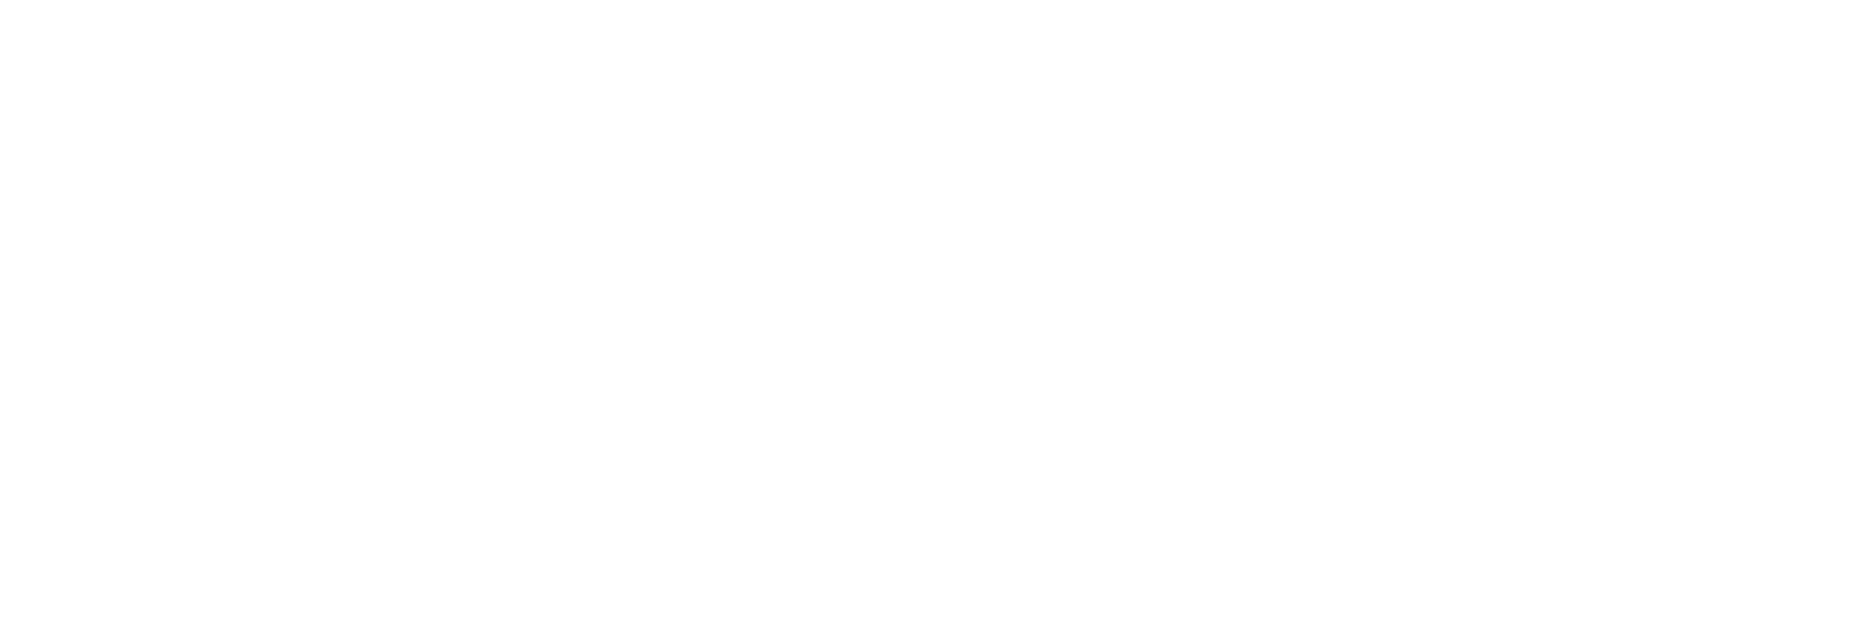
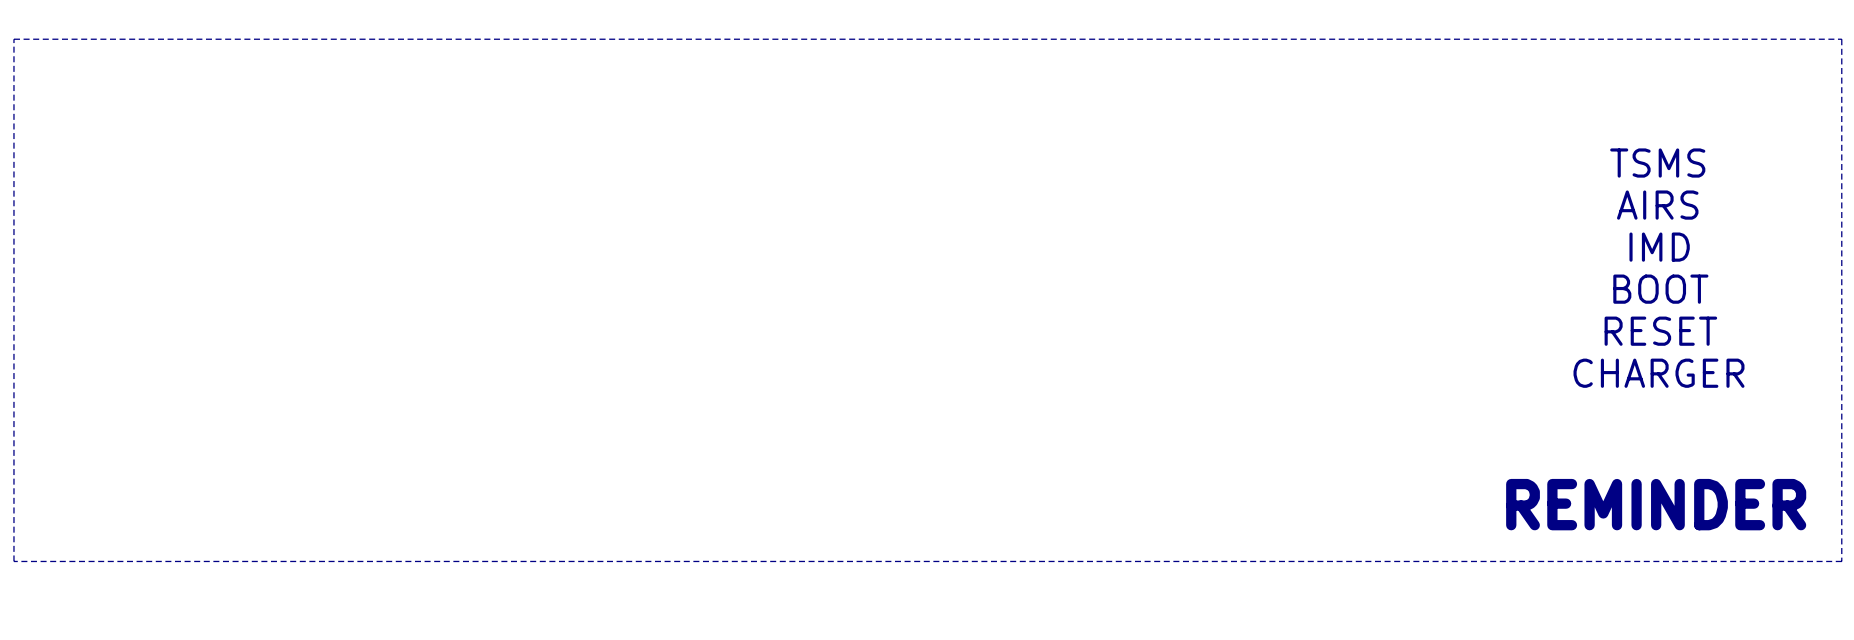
line: none -> (13, 39) (13, 561) (1841, 561) (1841, 39) (13, 39)
text: none -> TSMS (1657, 163)
text: none -> AIRS (1657, 205)
text: none -> IMD (1659, 247)
text: none -> BOOT (1660, 289)
text: none -> RESET (1660, 331)
text: none -> CHARGER (1659, 373)
text: none -> REMINDER (1656, 504)

